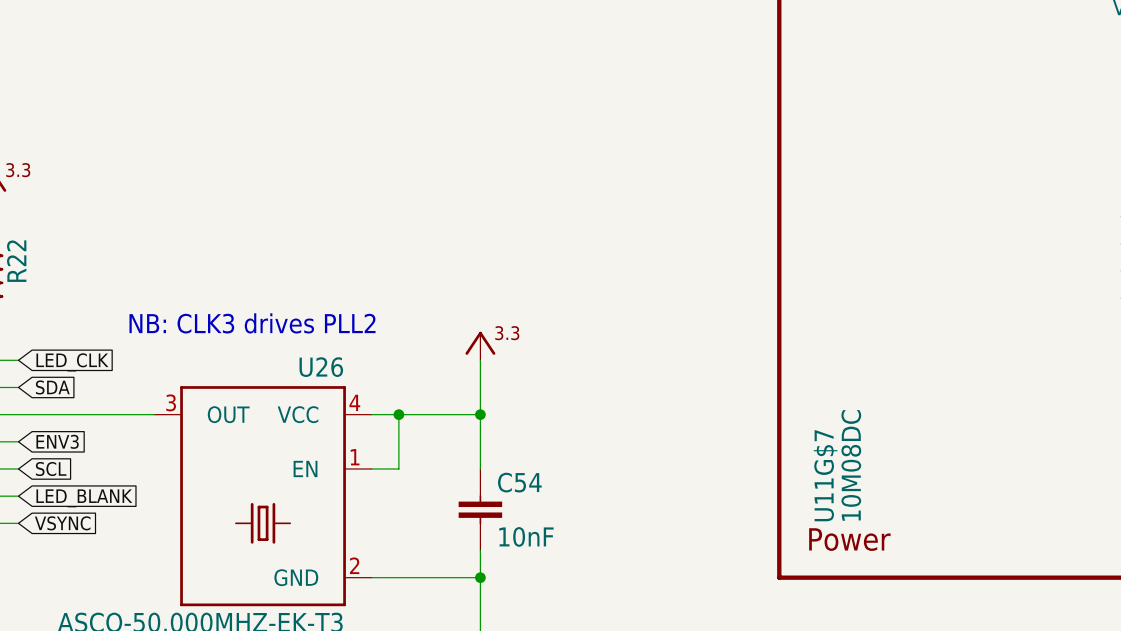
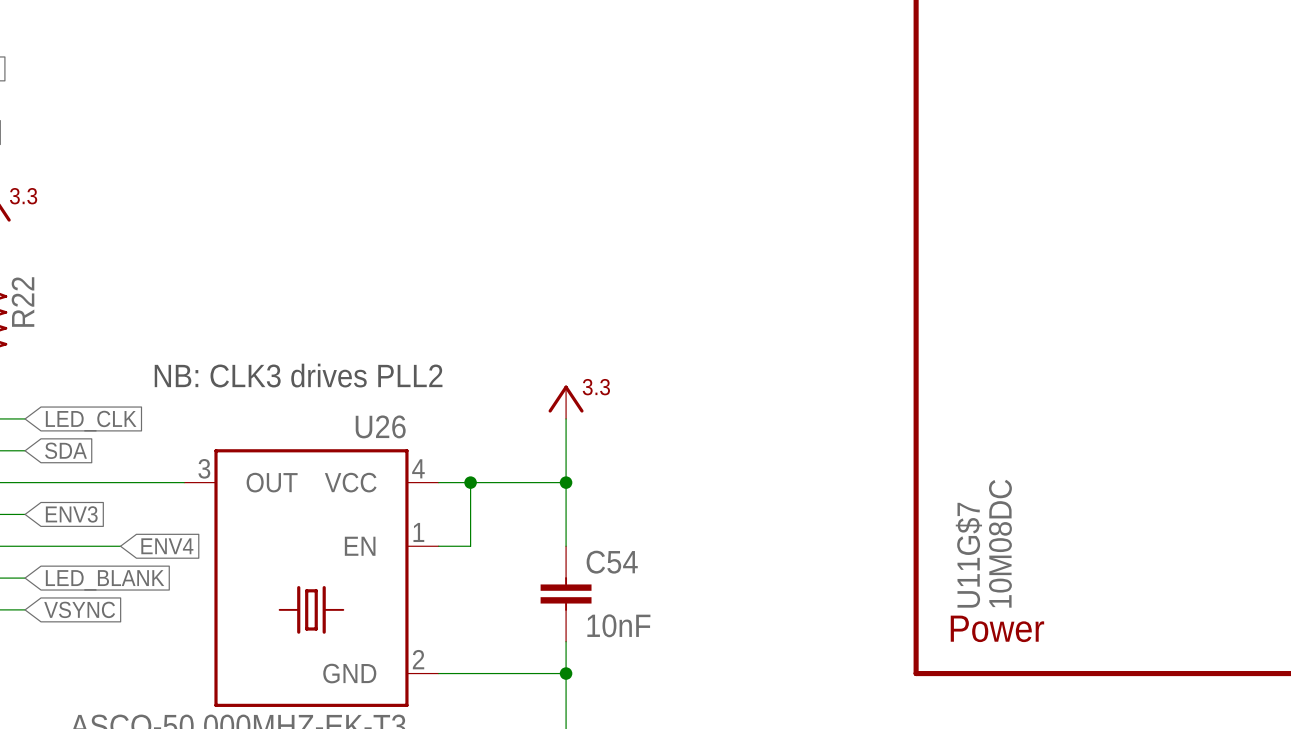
wire: none -> (25, 546) (120, 546)
global label: none -> ENV4 (167, 546)
global label: SCL (51, 469) -> none

